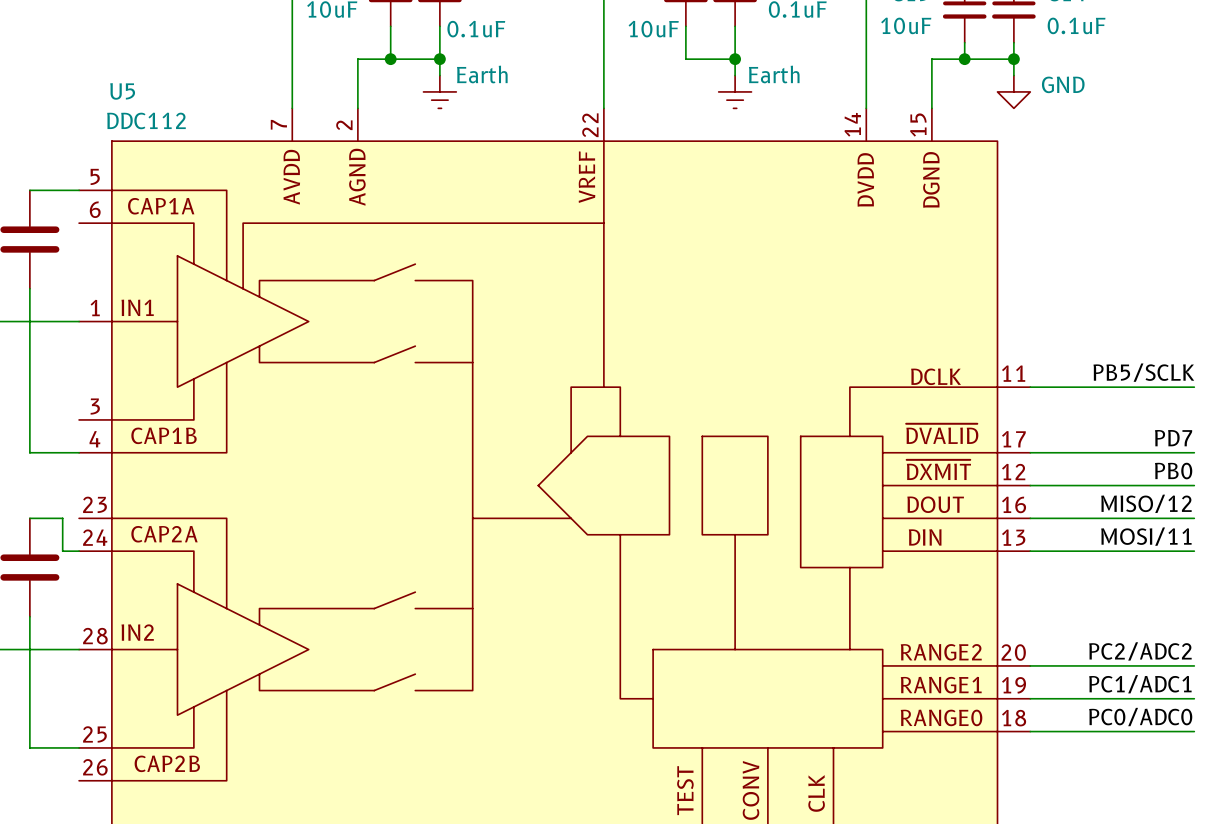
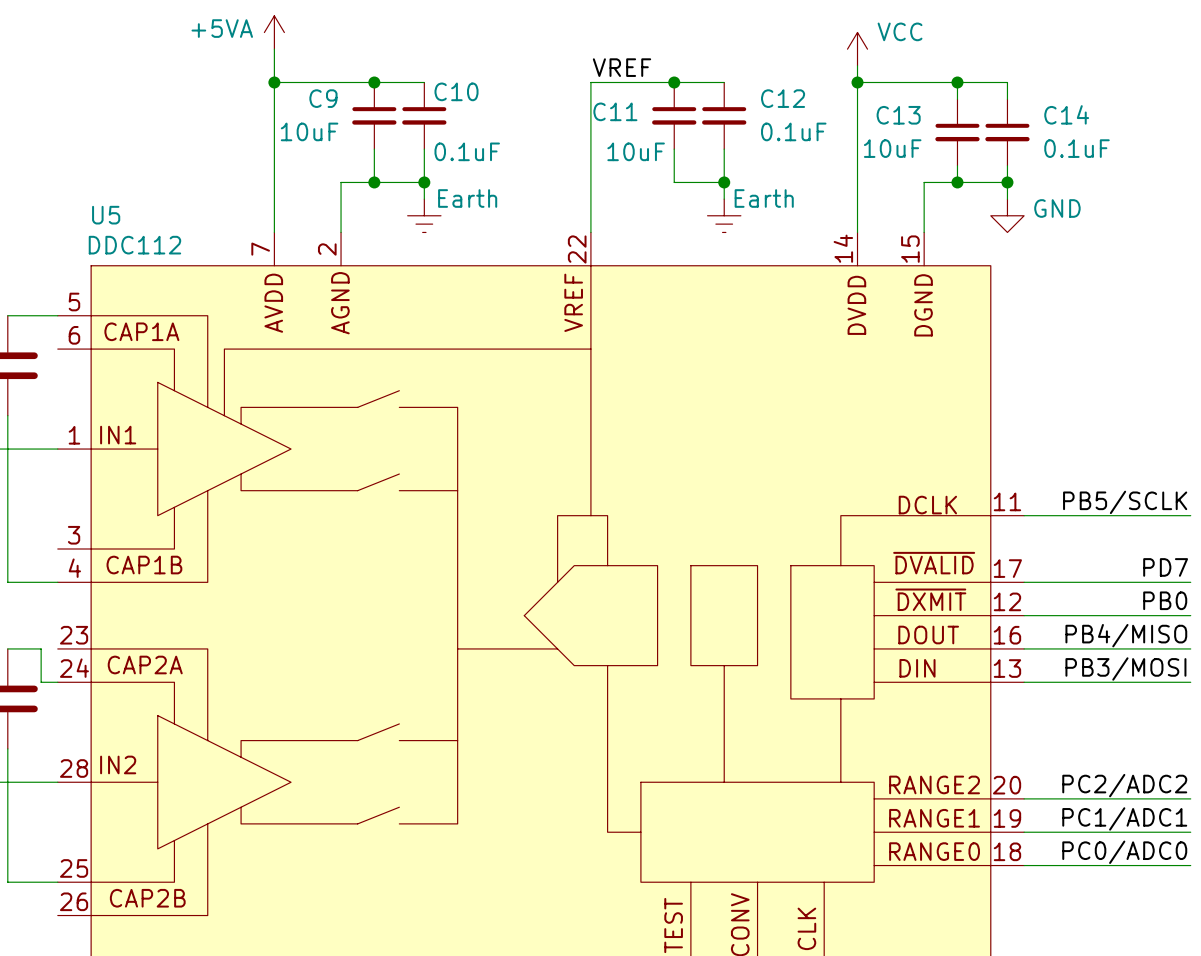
label: MISO/12 (1146, 503) -> PB4/MISO (1126, 635)
label: MOSI/11 (1146, 536) -> PB3/MOSI (1125, 669)

